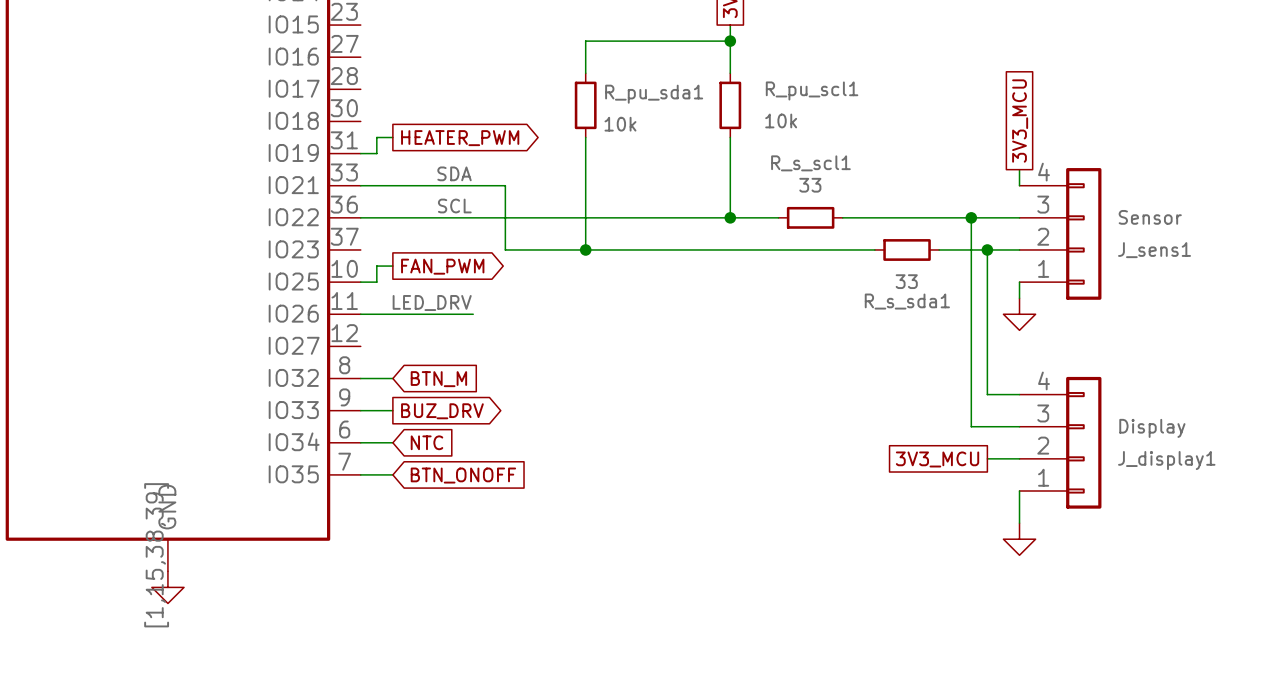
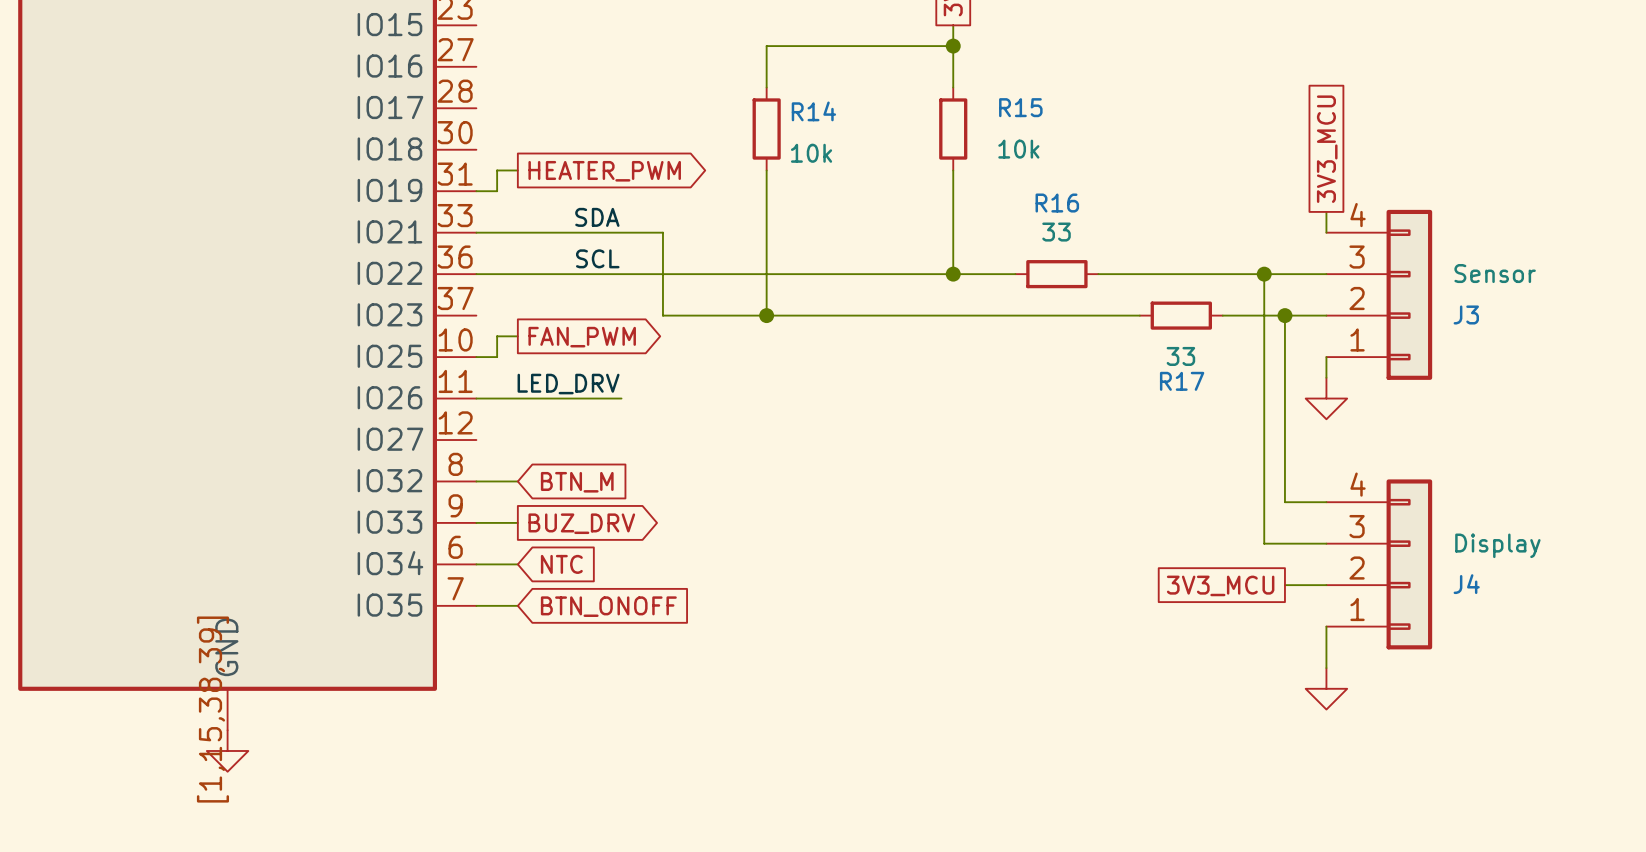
R_pu_scl1 name: R_pu_scl1 (812, 90) -> R15 (1020, 107)
R_pu_sda1 name: R_pu_sda1 (654, 94) -> R14 (813, 111)
R_s_scl1 name: R_s_scl1 (810, 163) -> R16 (1057, 203)
J_sens1 name: J_sens1 (1154, 250) -> J3 (1466, 314)
R_s_sda1 name: R_s_sda1 (907, 301) -> R17 (1182, 381)
J_display1 name: J_display1 (1166, 460) -> J4 (1466, 584)

